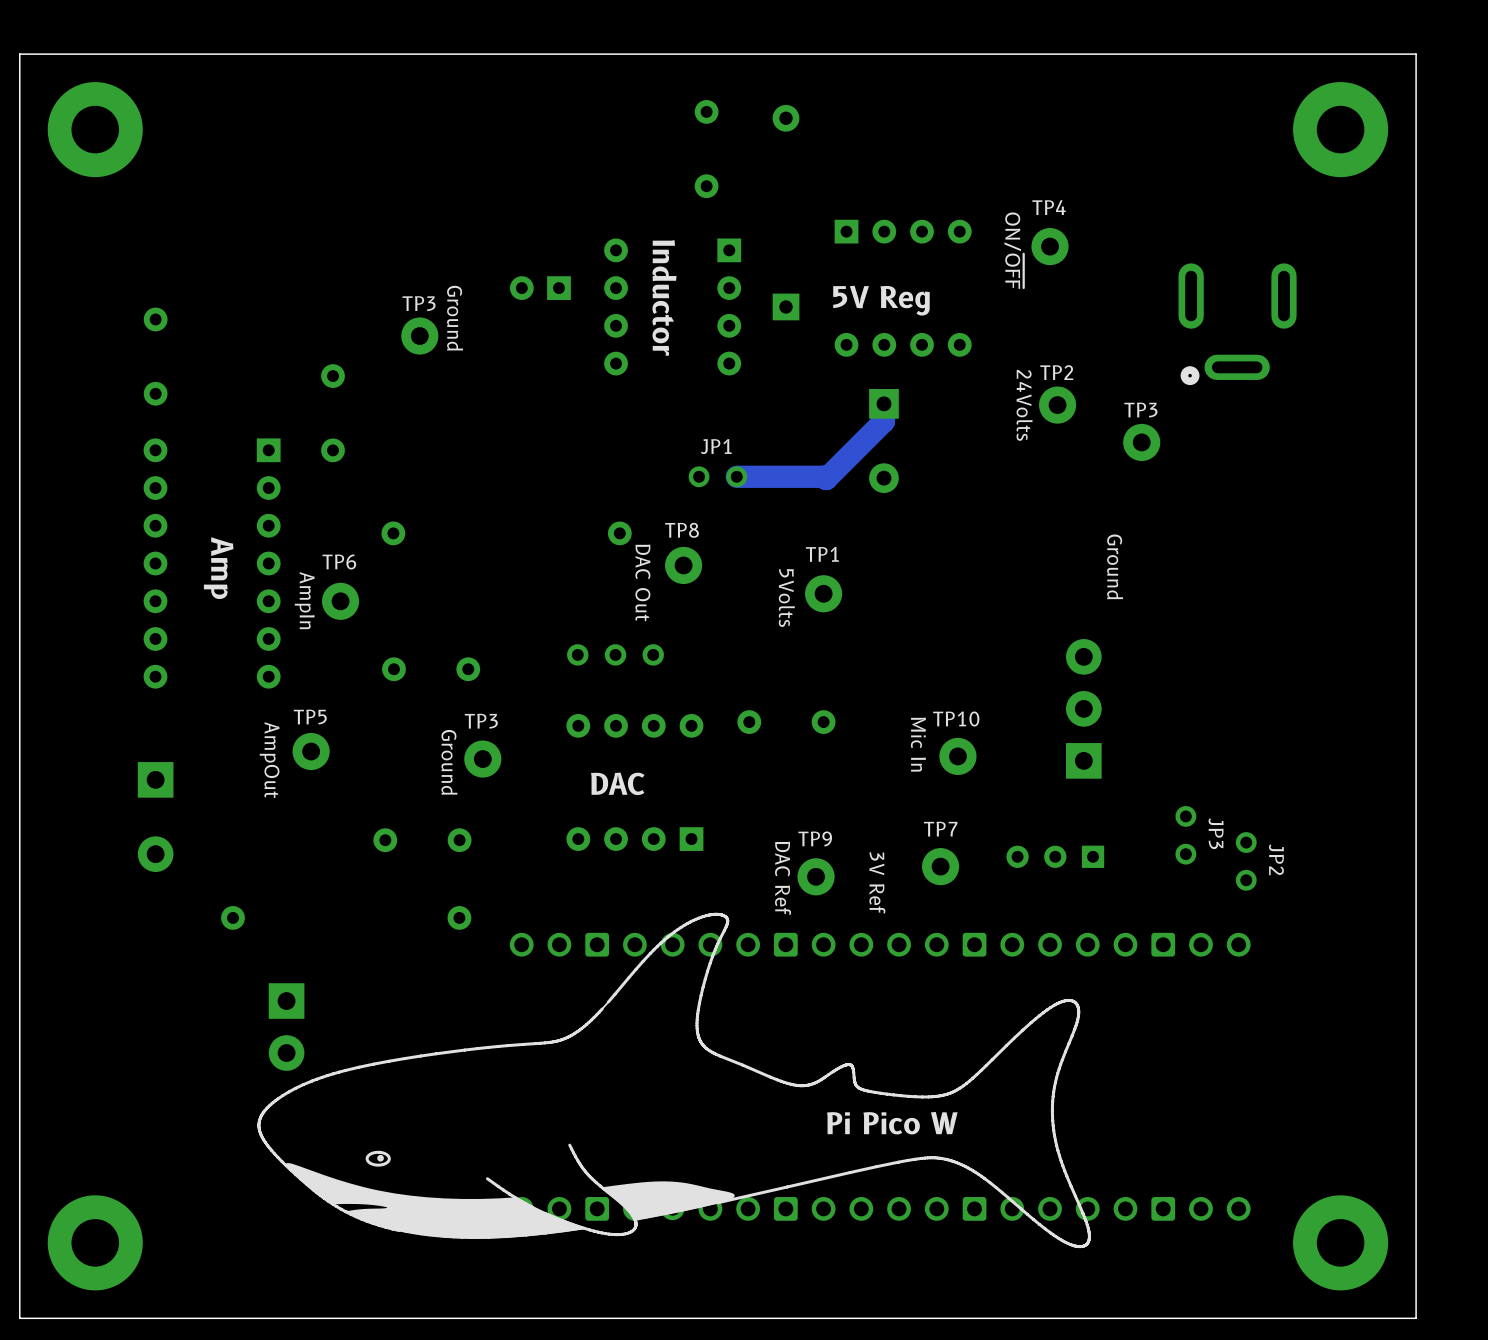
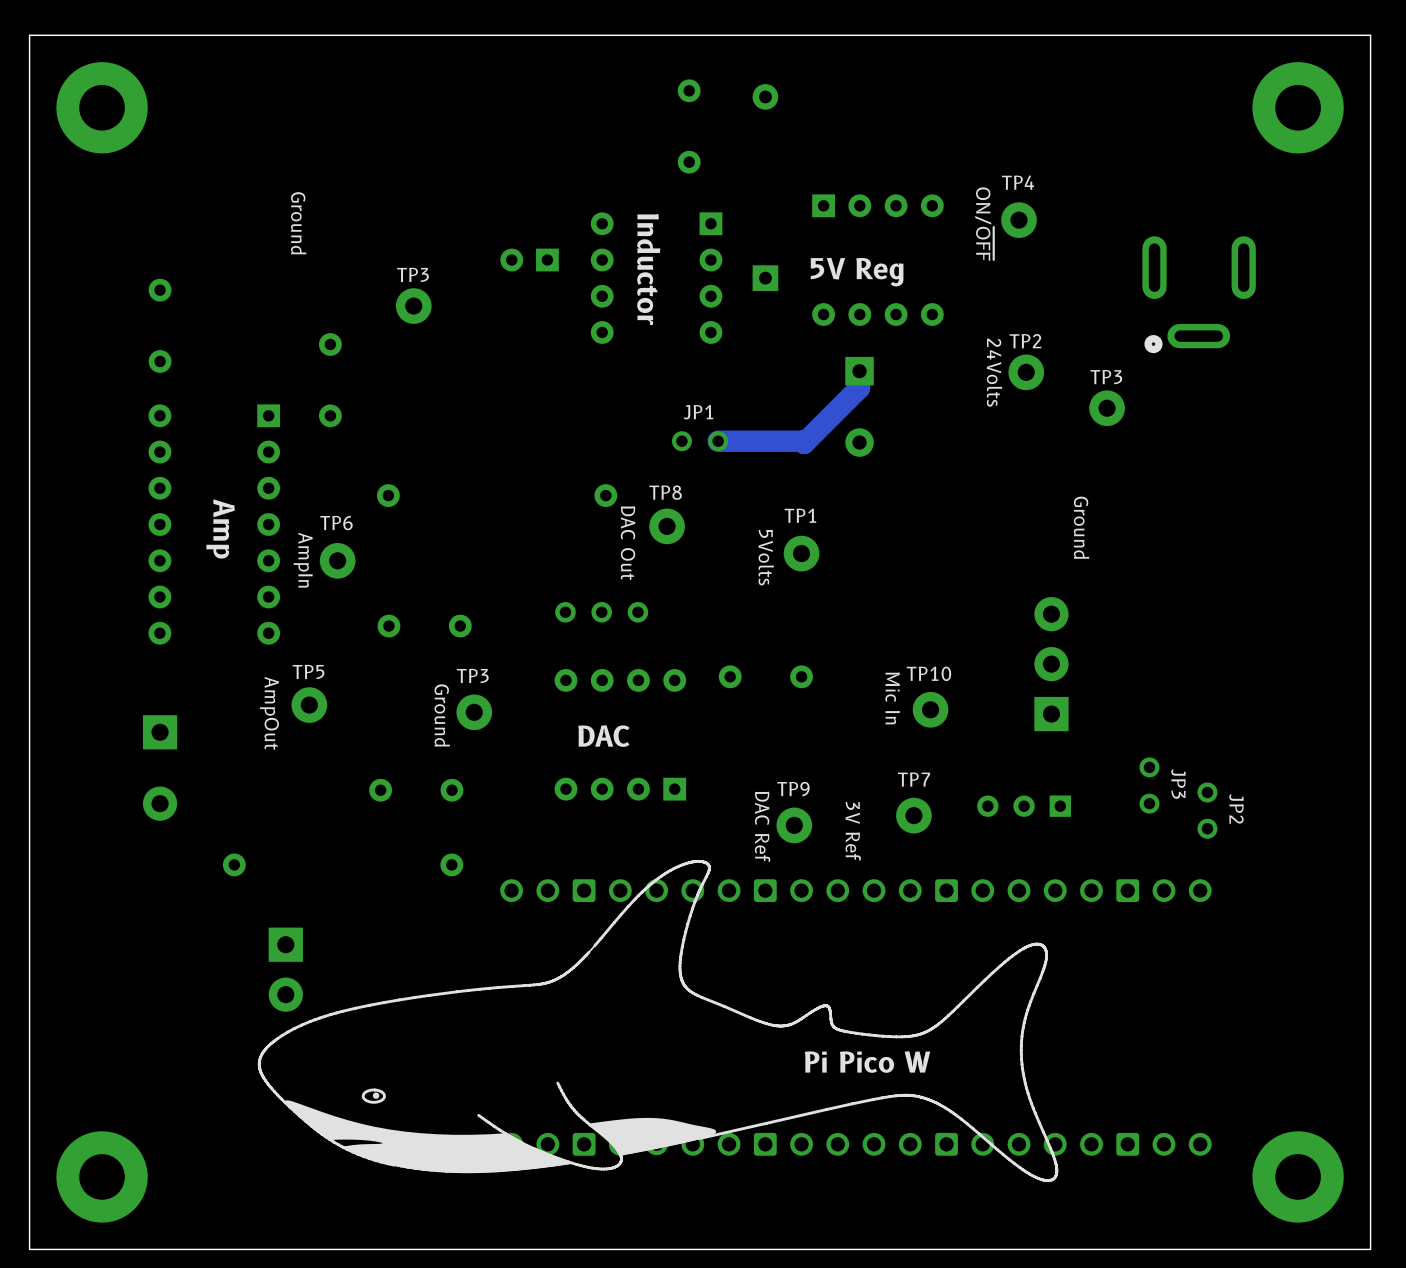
text position: Ground (455, 318) -> Ground (298, 223)

